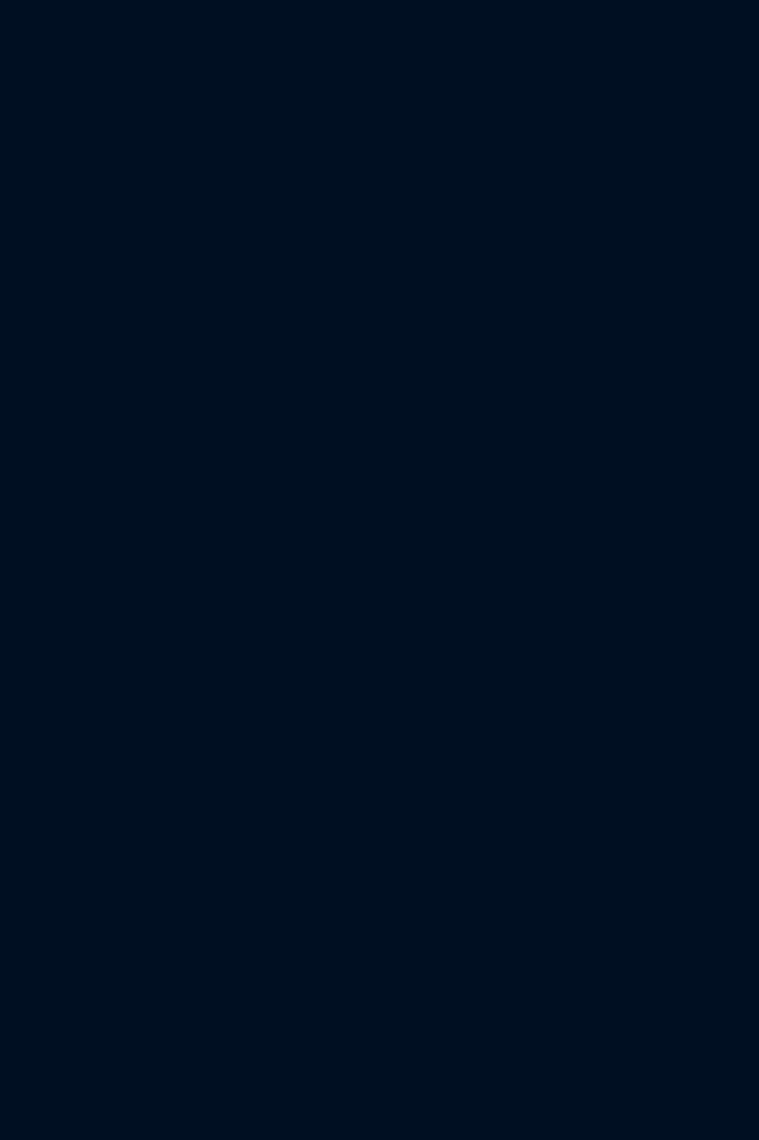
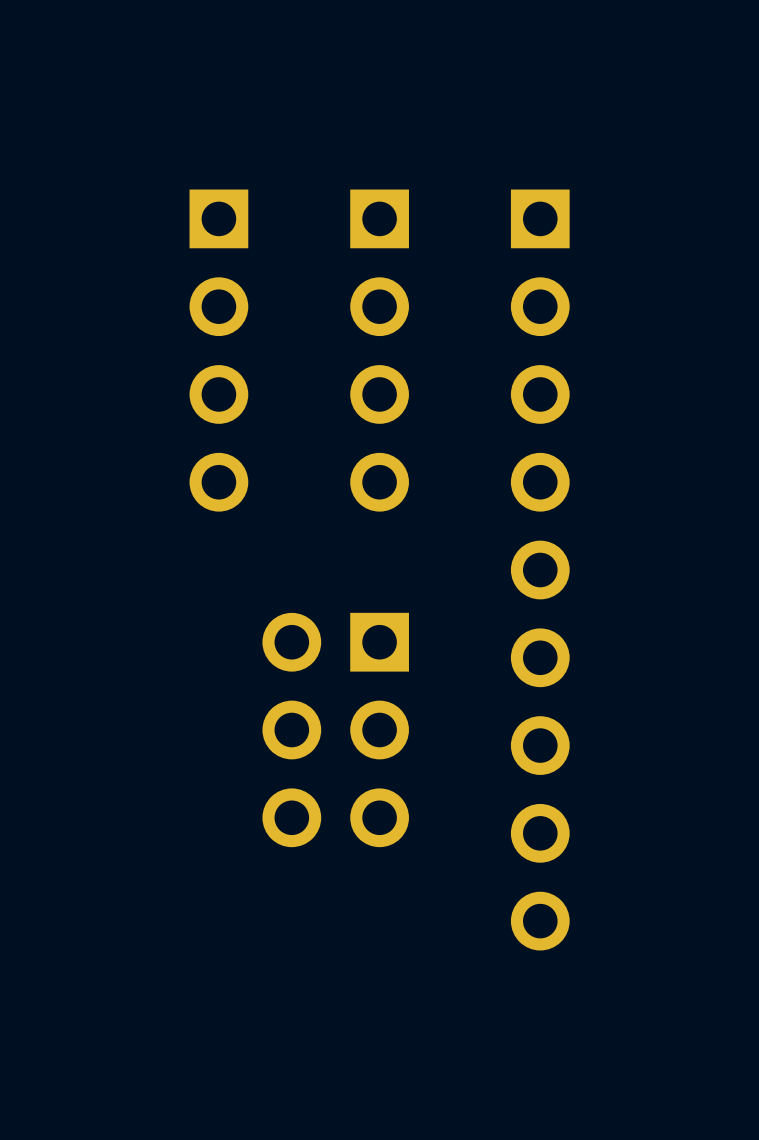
part: none -> (218, 350)
part: none -> (379, 350)
part: none -> (540, 570)
part: none -> (335, 730)

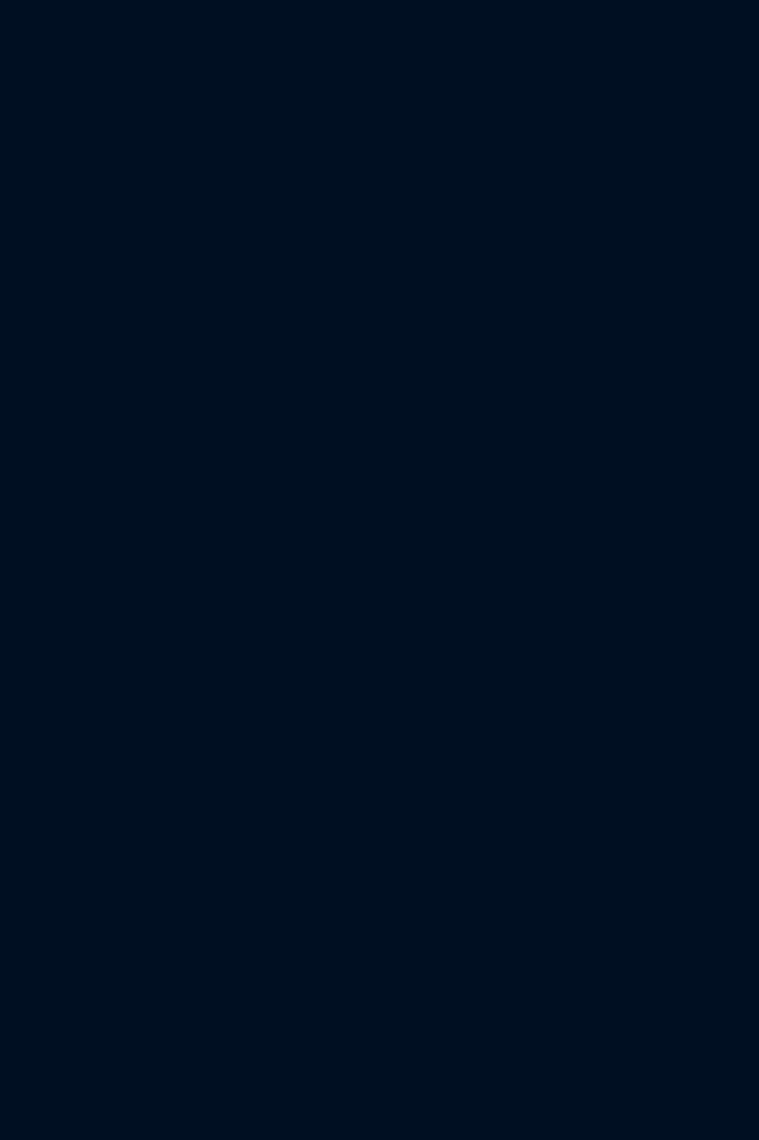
part: (218, 350) -> none
part: (379, 350) -> none
part: (540, 570) -> none
part: (335, 730) -> none

